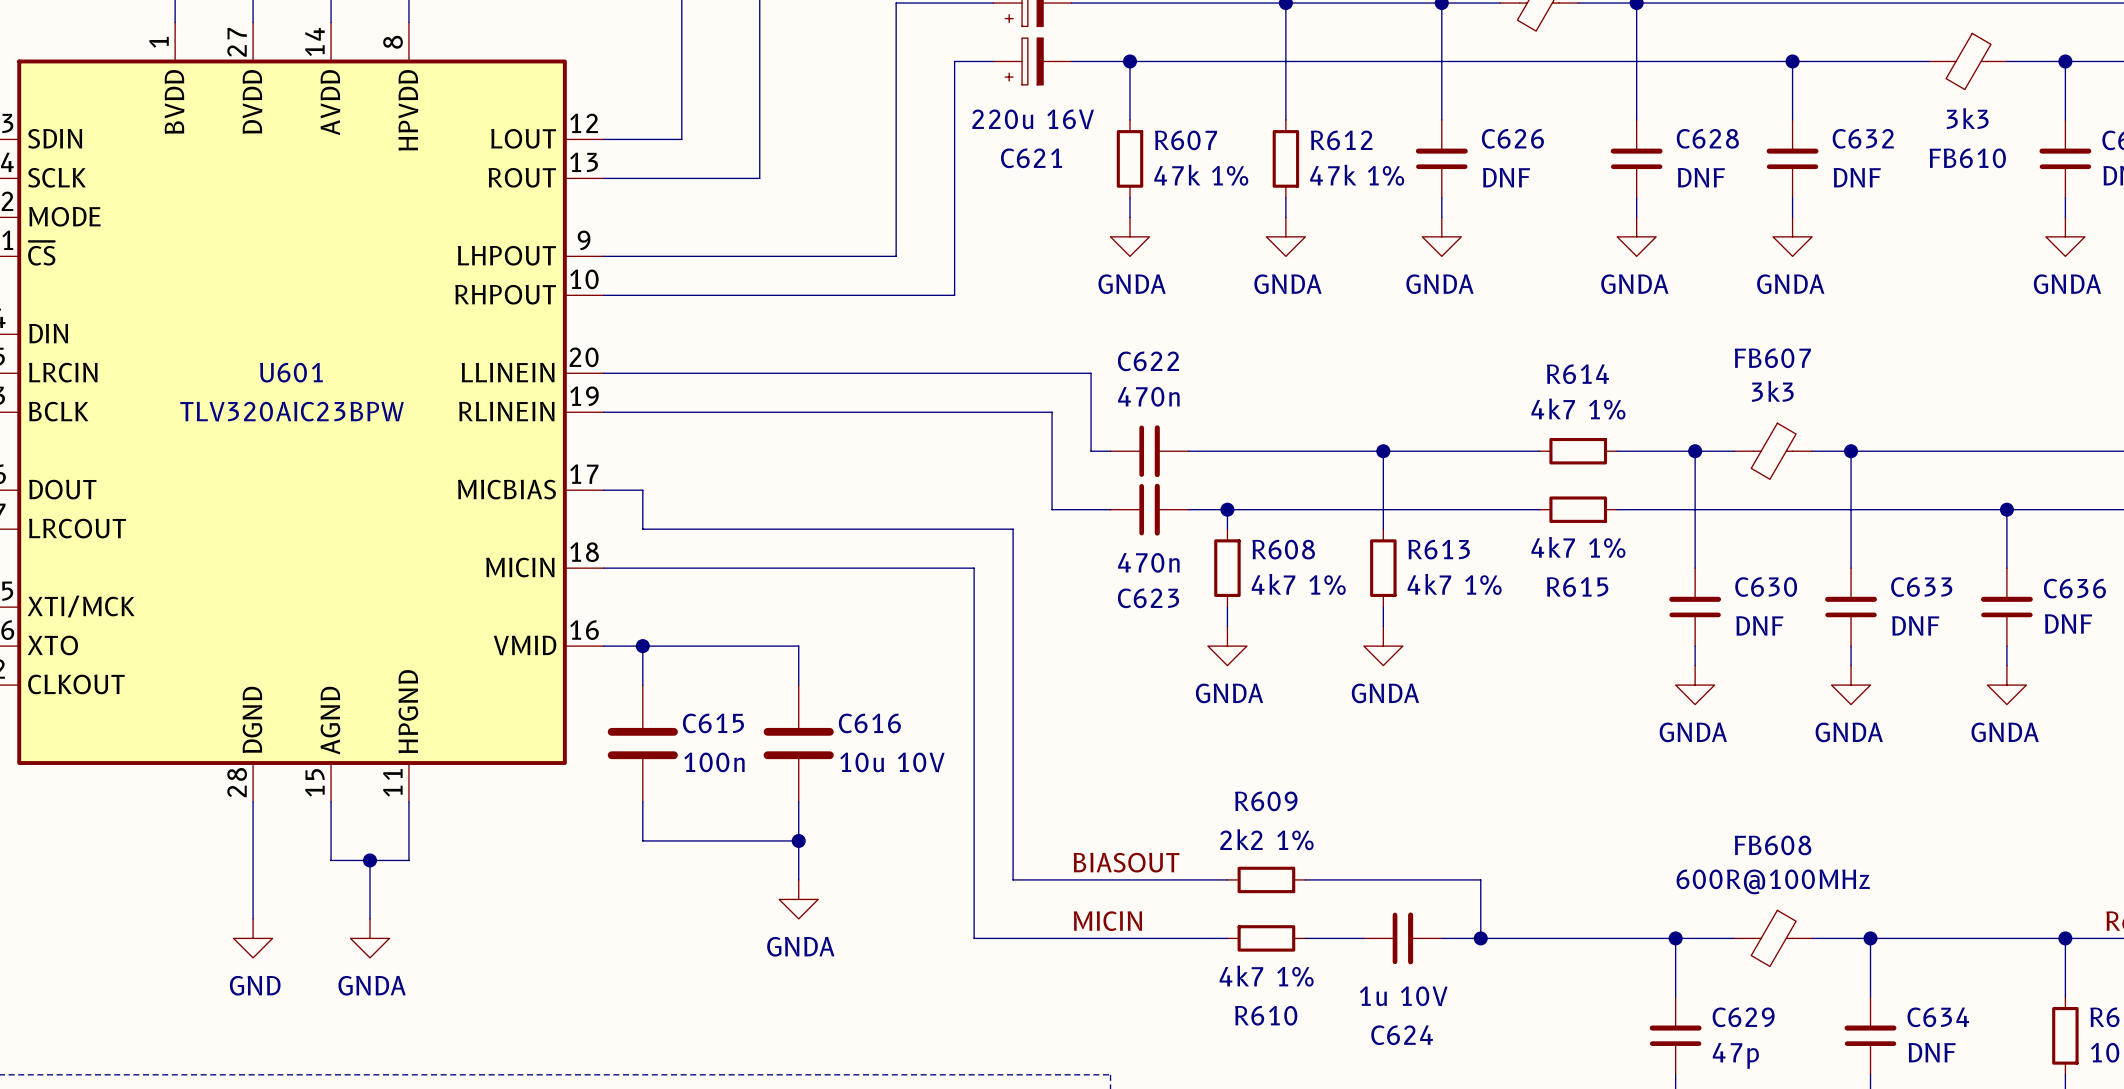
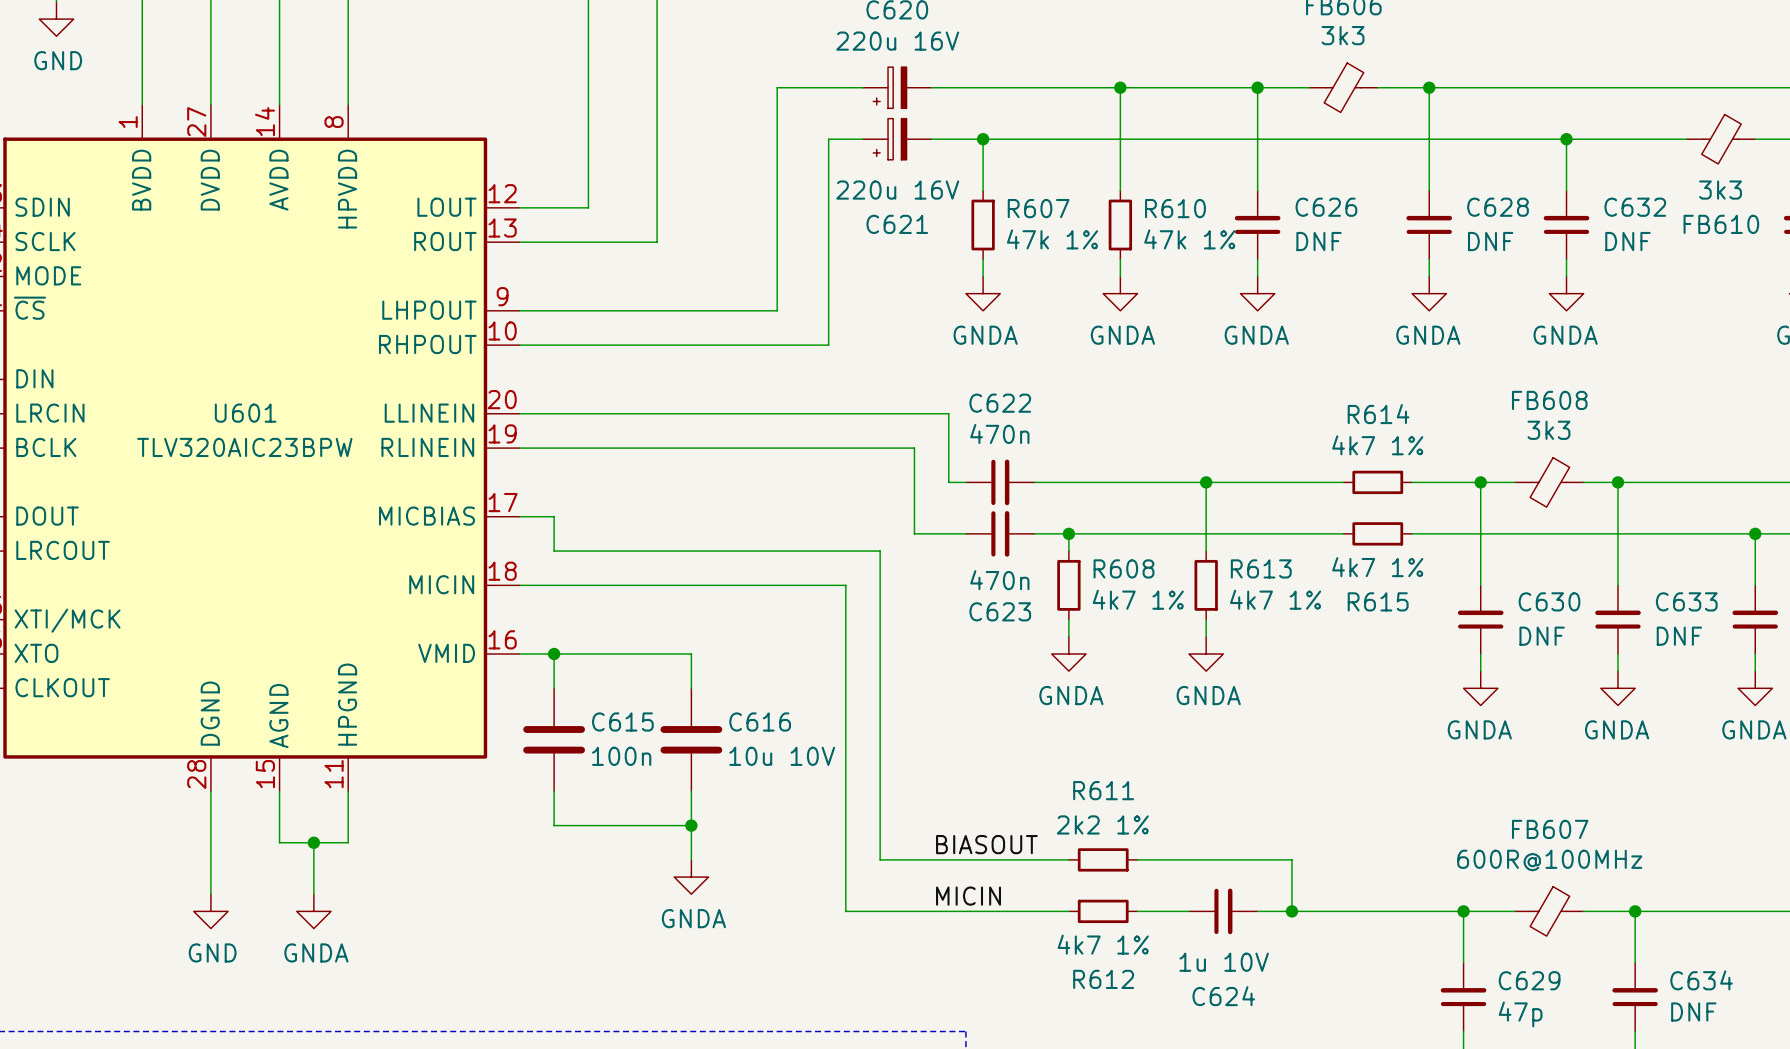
R612 name: R612 (1341, 140) -> R610 (1175, 208)
FB607 name: FB607 (1772, 358) -> FB608 (1549, 400)
R609 name: R609 (1266, 801) -> R611 (1103, 790)
FB608 name: FB608 (1773, 845) -> FB607 (1550, 829)
R610 name: R610 (1266, 1015) -> R612 (1103, 979)

